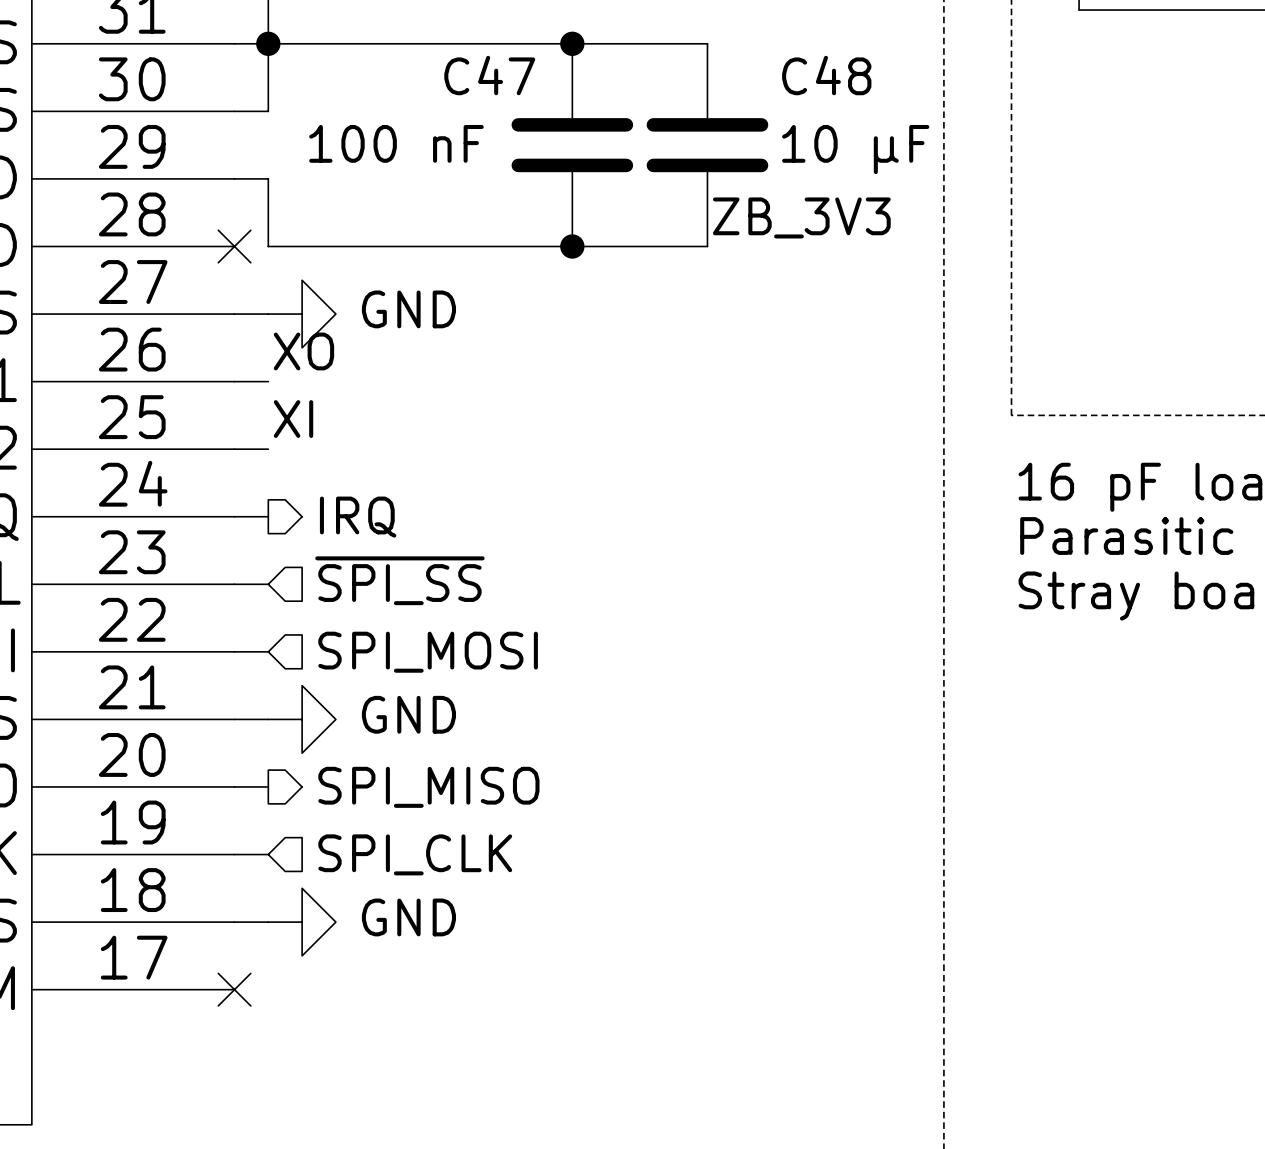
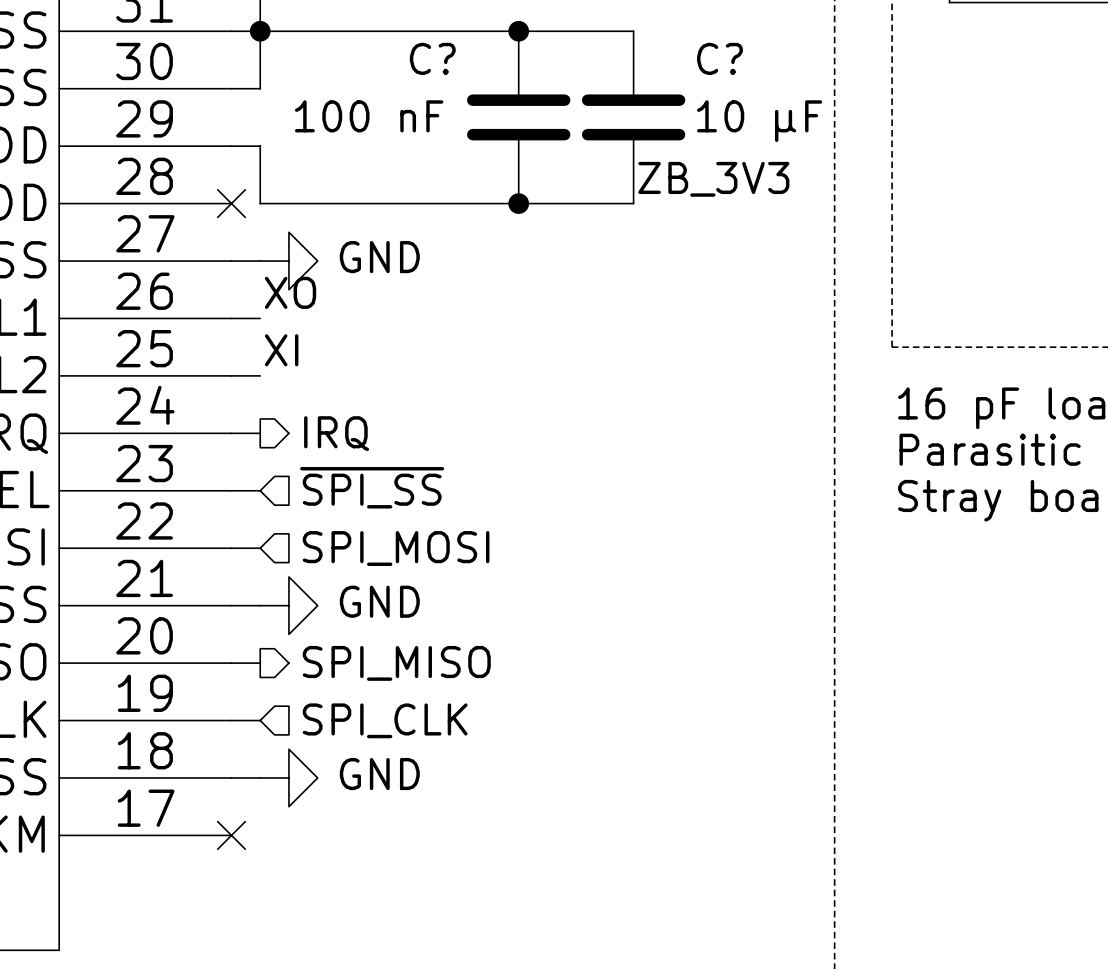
C47 name: C47 (489, 75) -> C? (432, 58)
C48 name: C48 (826, 75) -> C? (719, 58)

